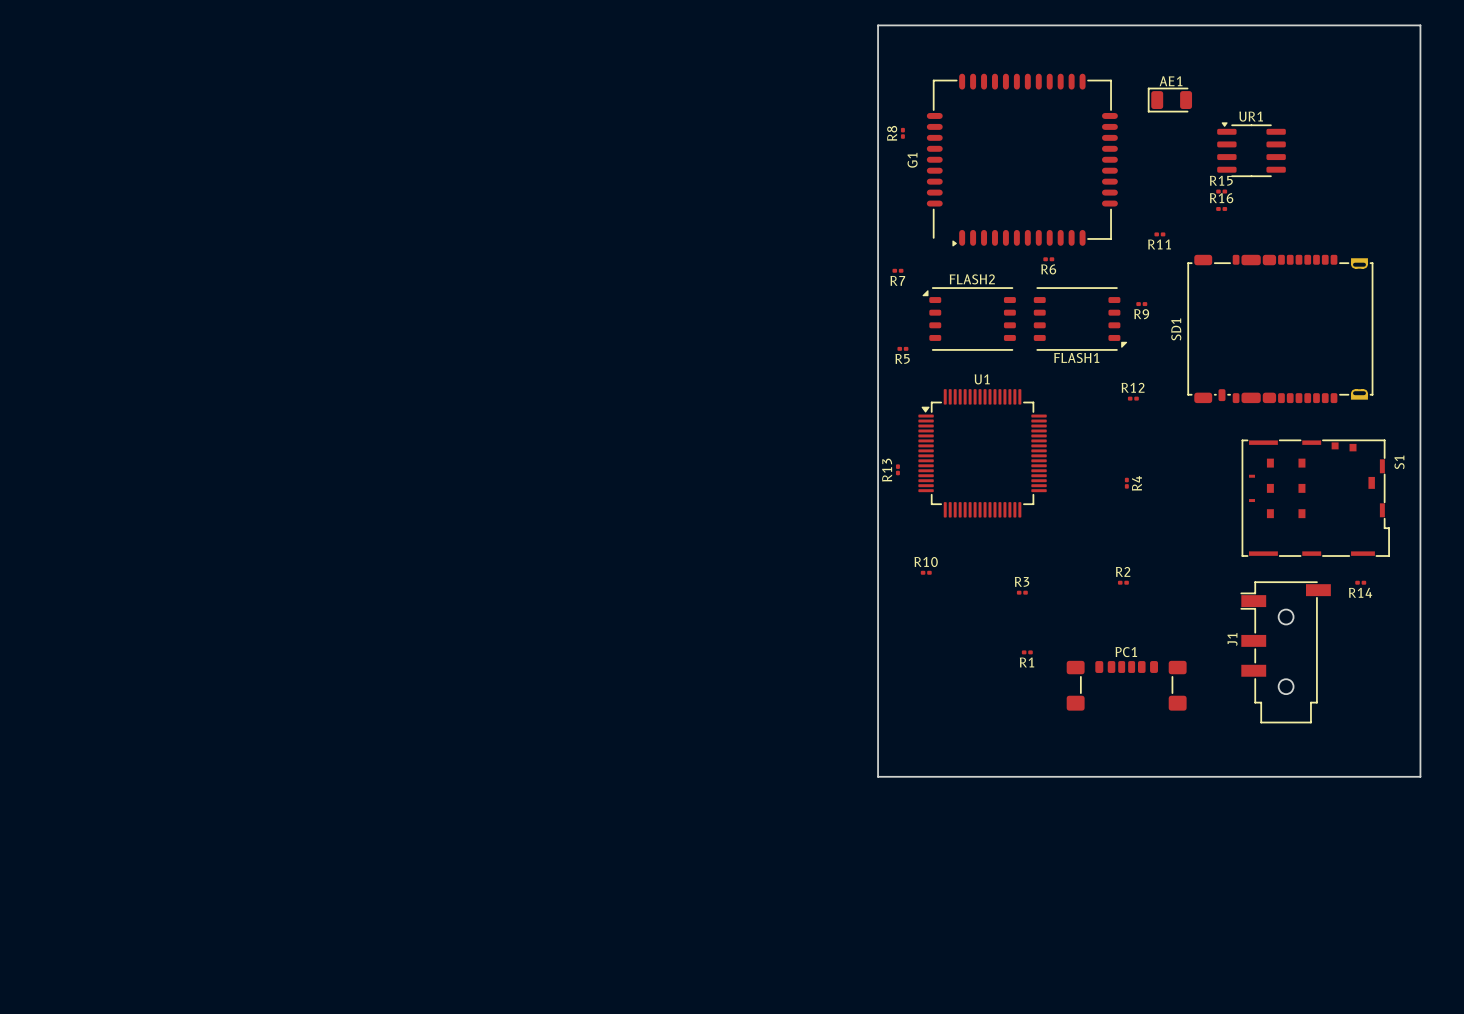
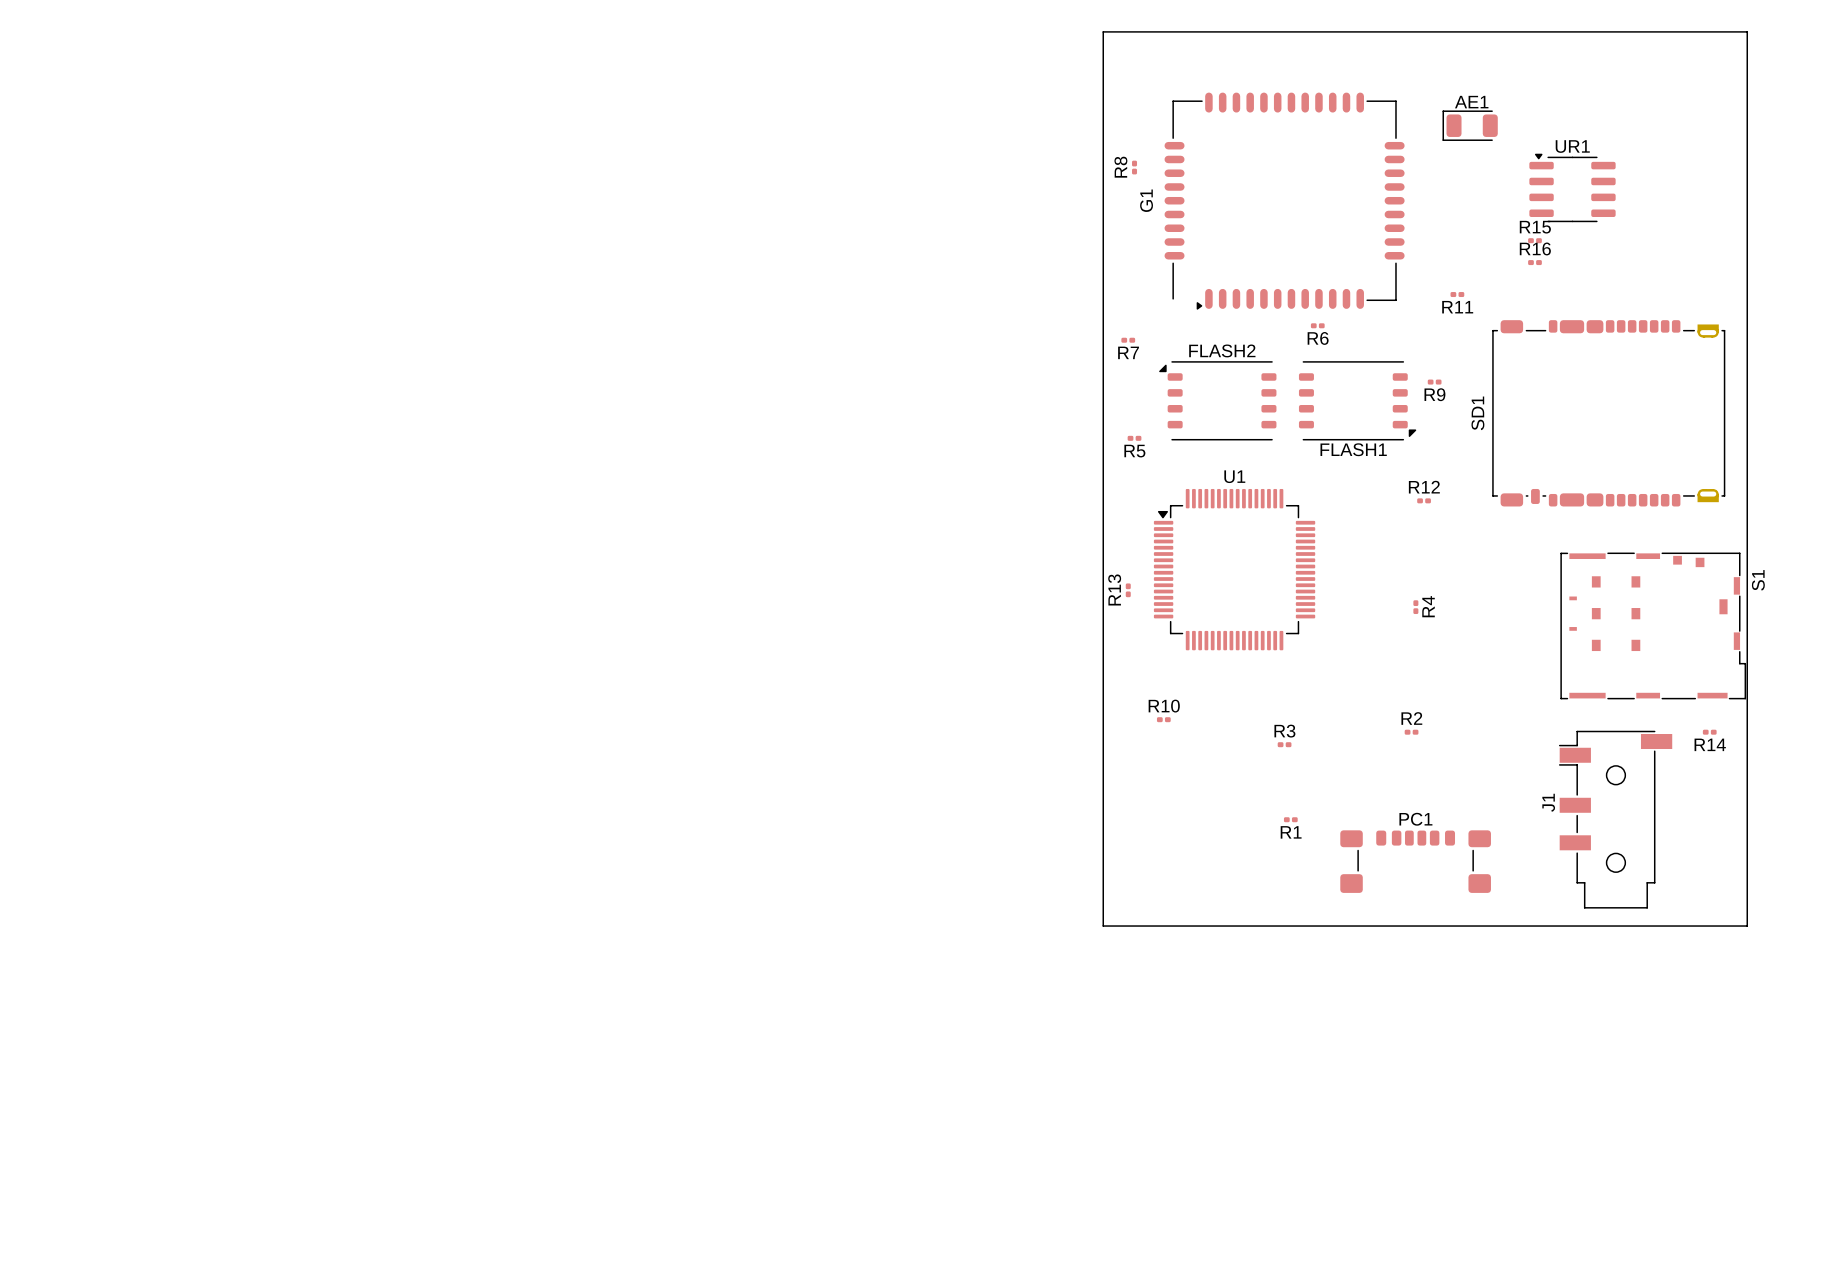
board edge: (1390, 25) (1420, 25) (1420, 776) (878, 776) (878, 736) -> (1747, 31) (1747, 926) (1103, 926)

